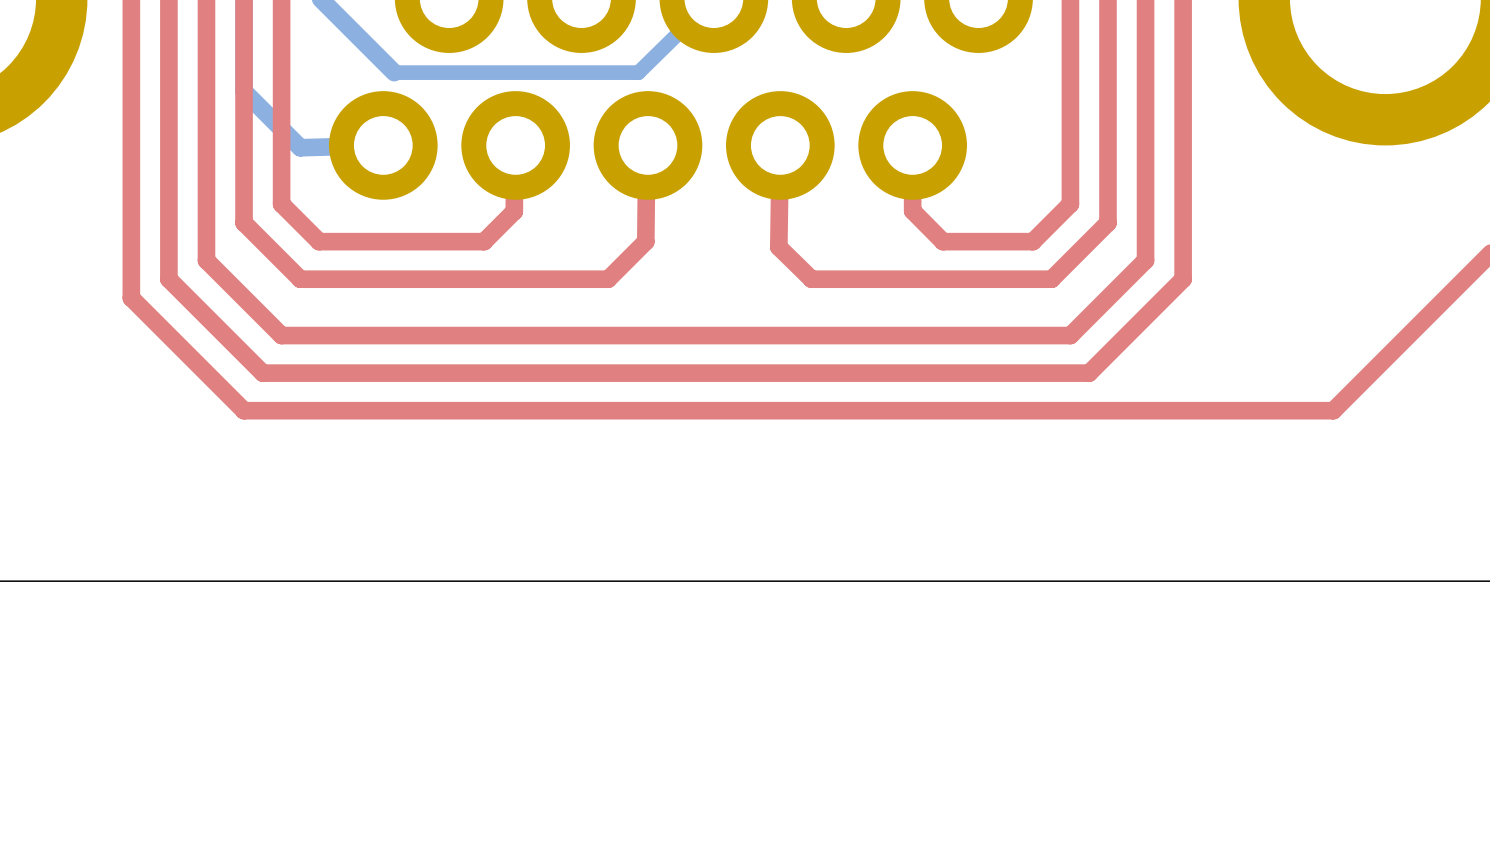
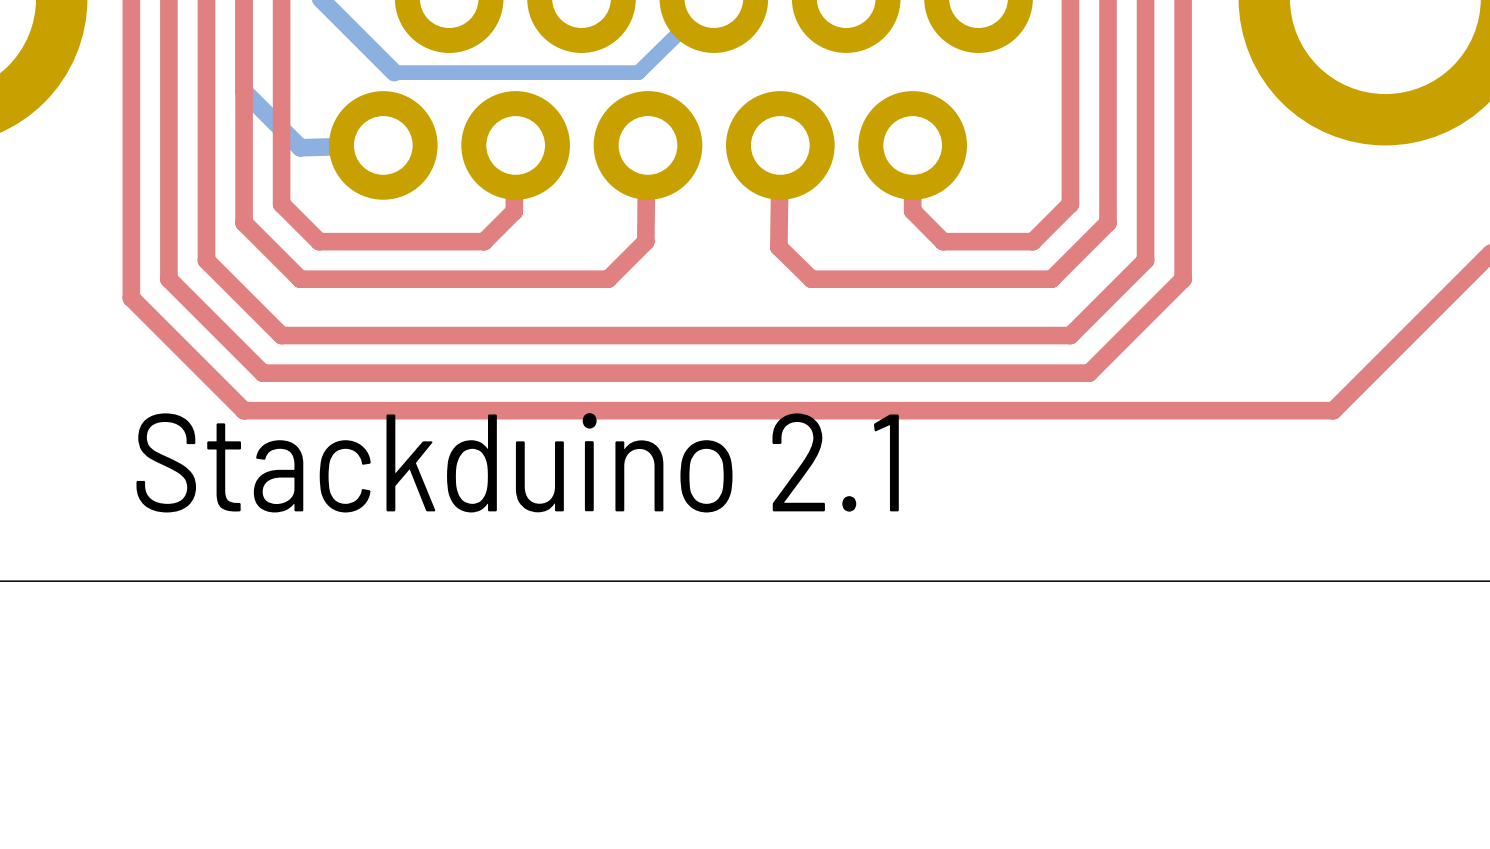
text: none -> Stackduino 2.1 (517, 462)

